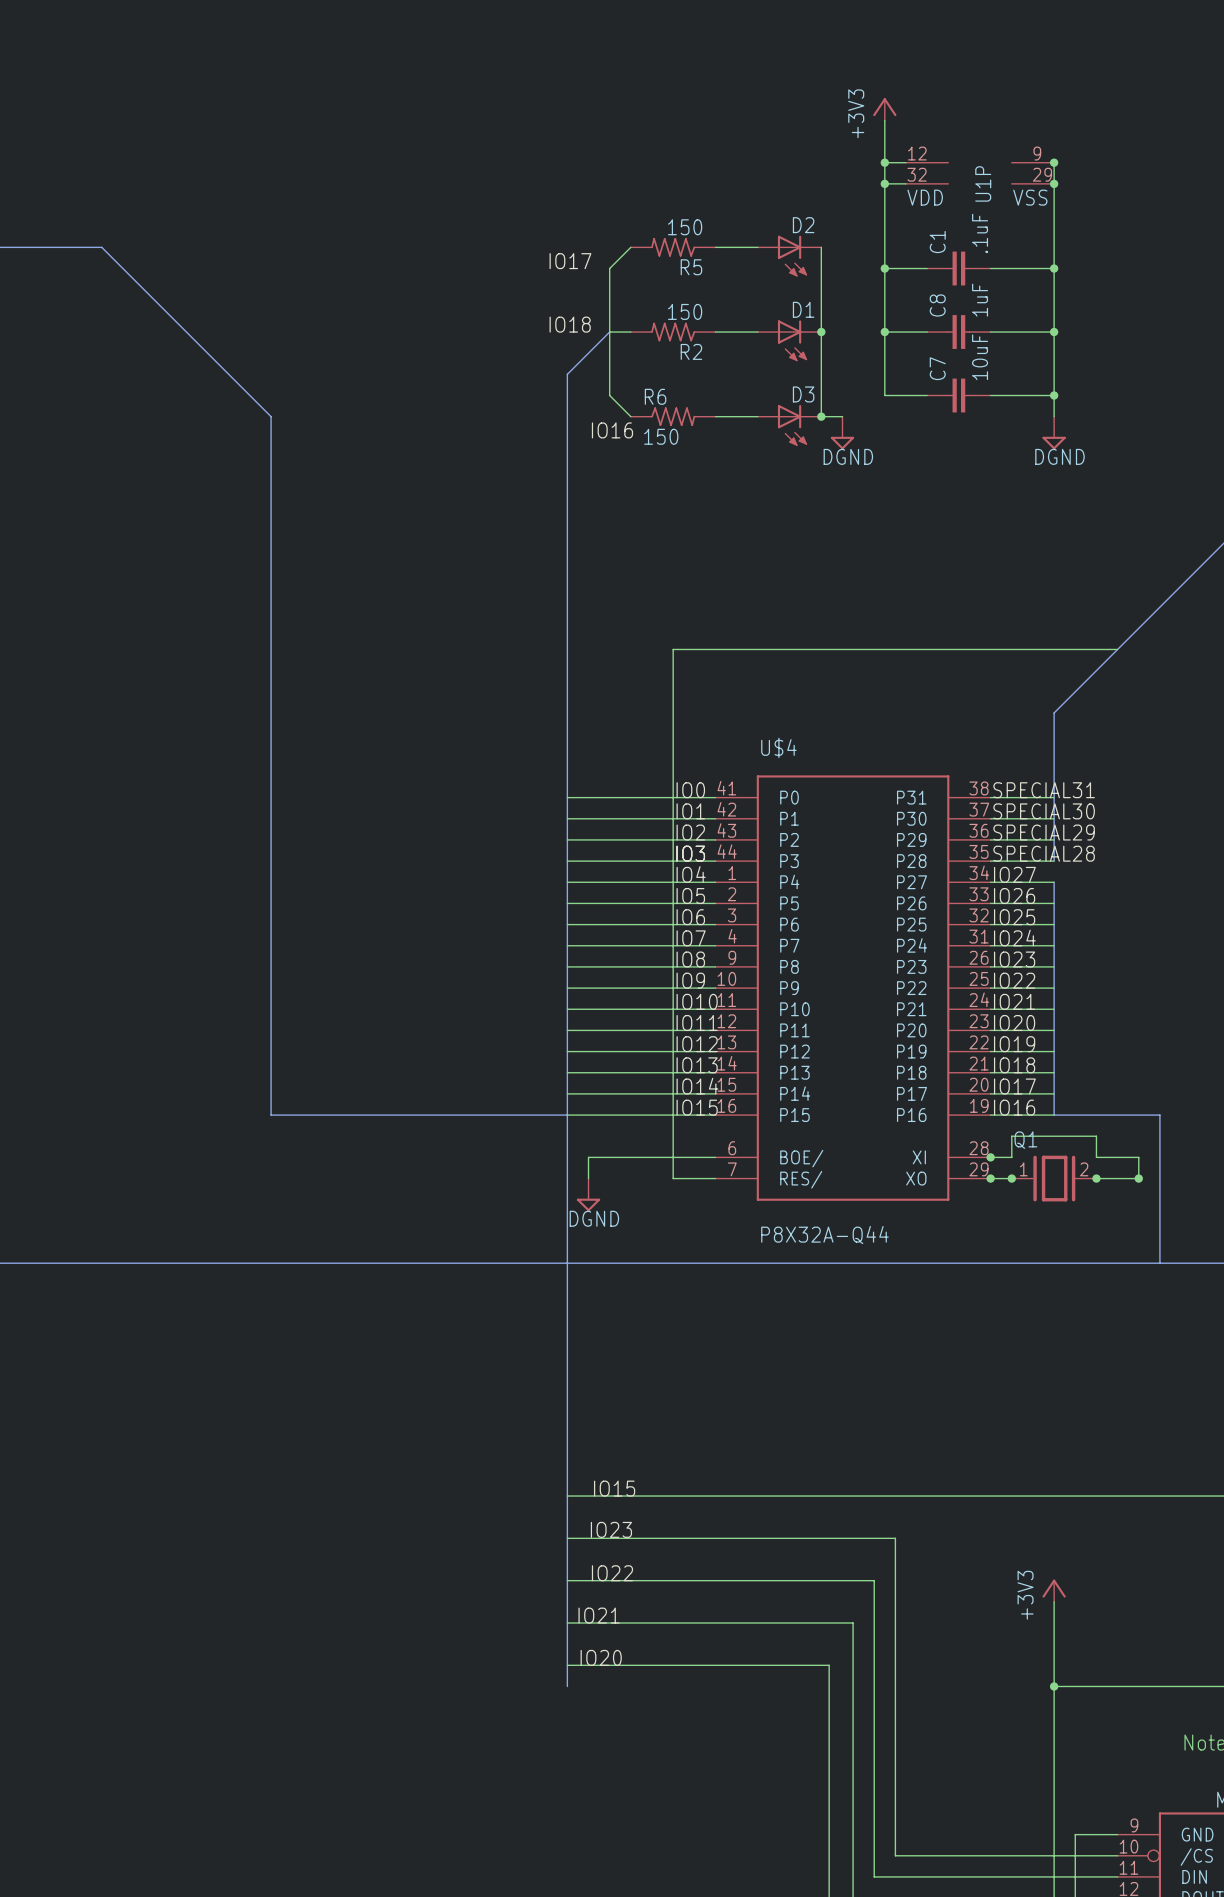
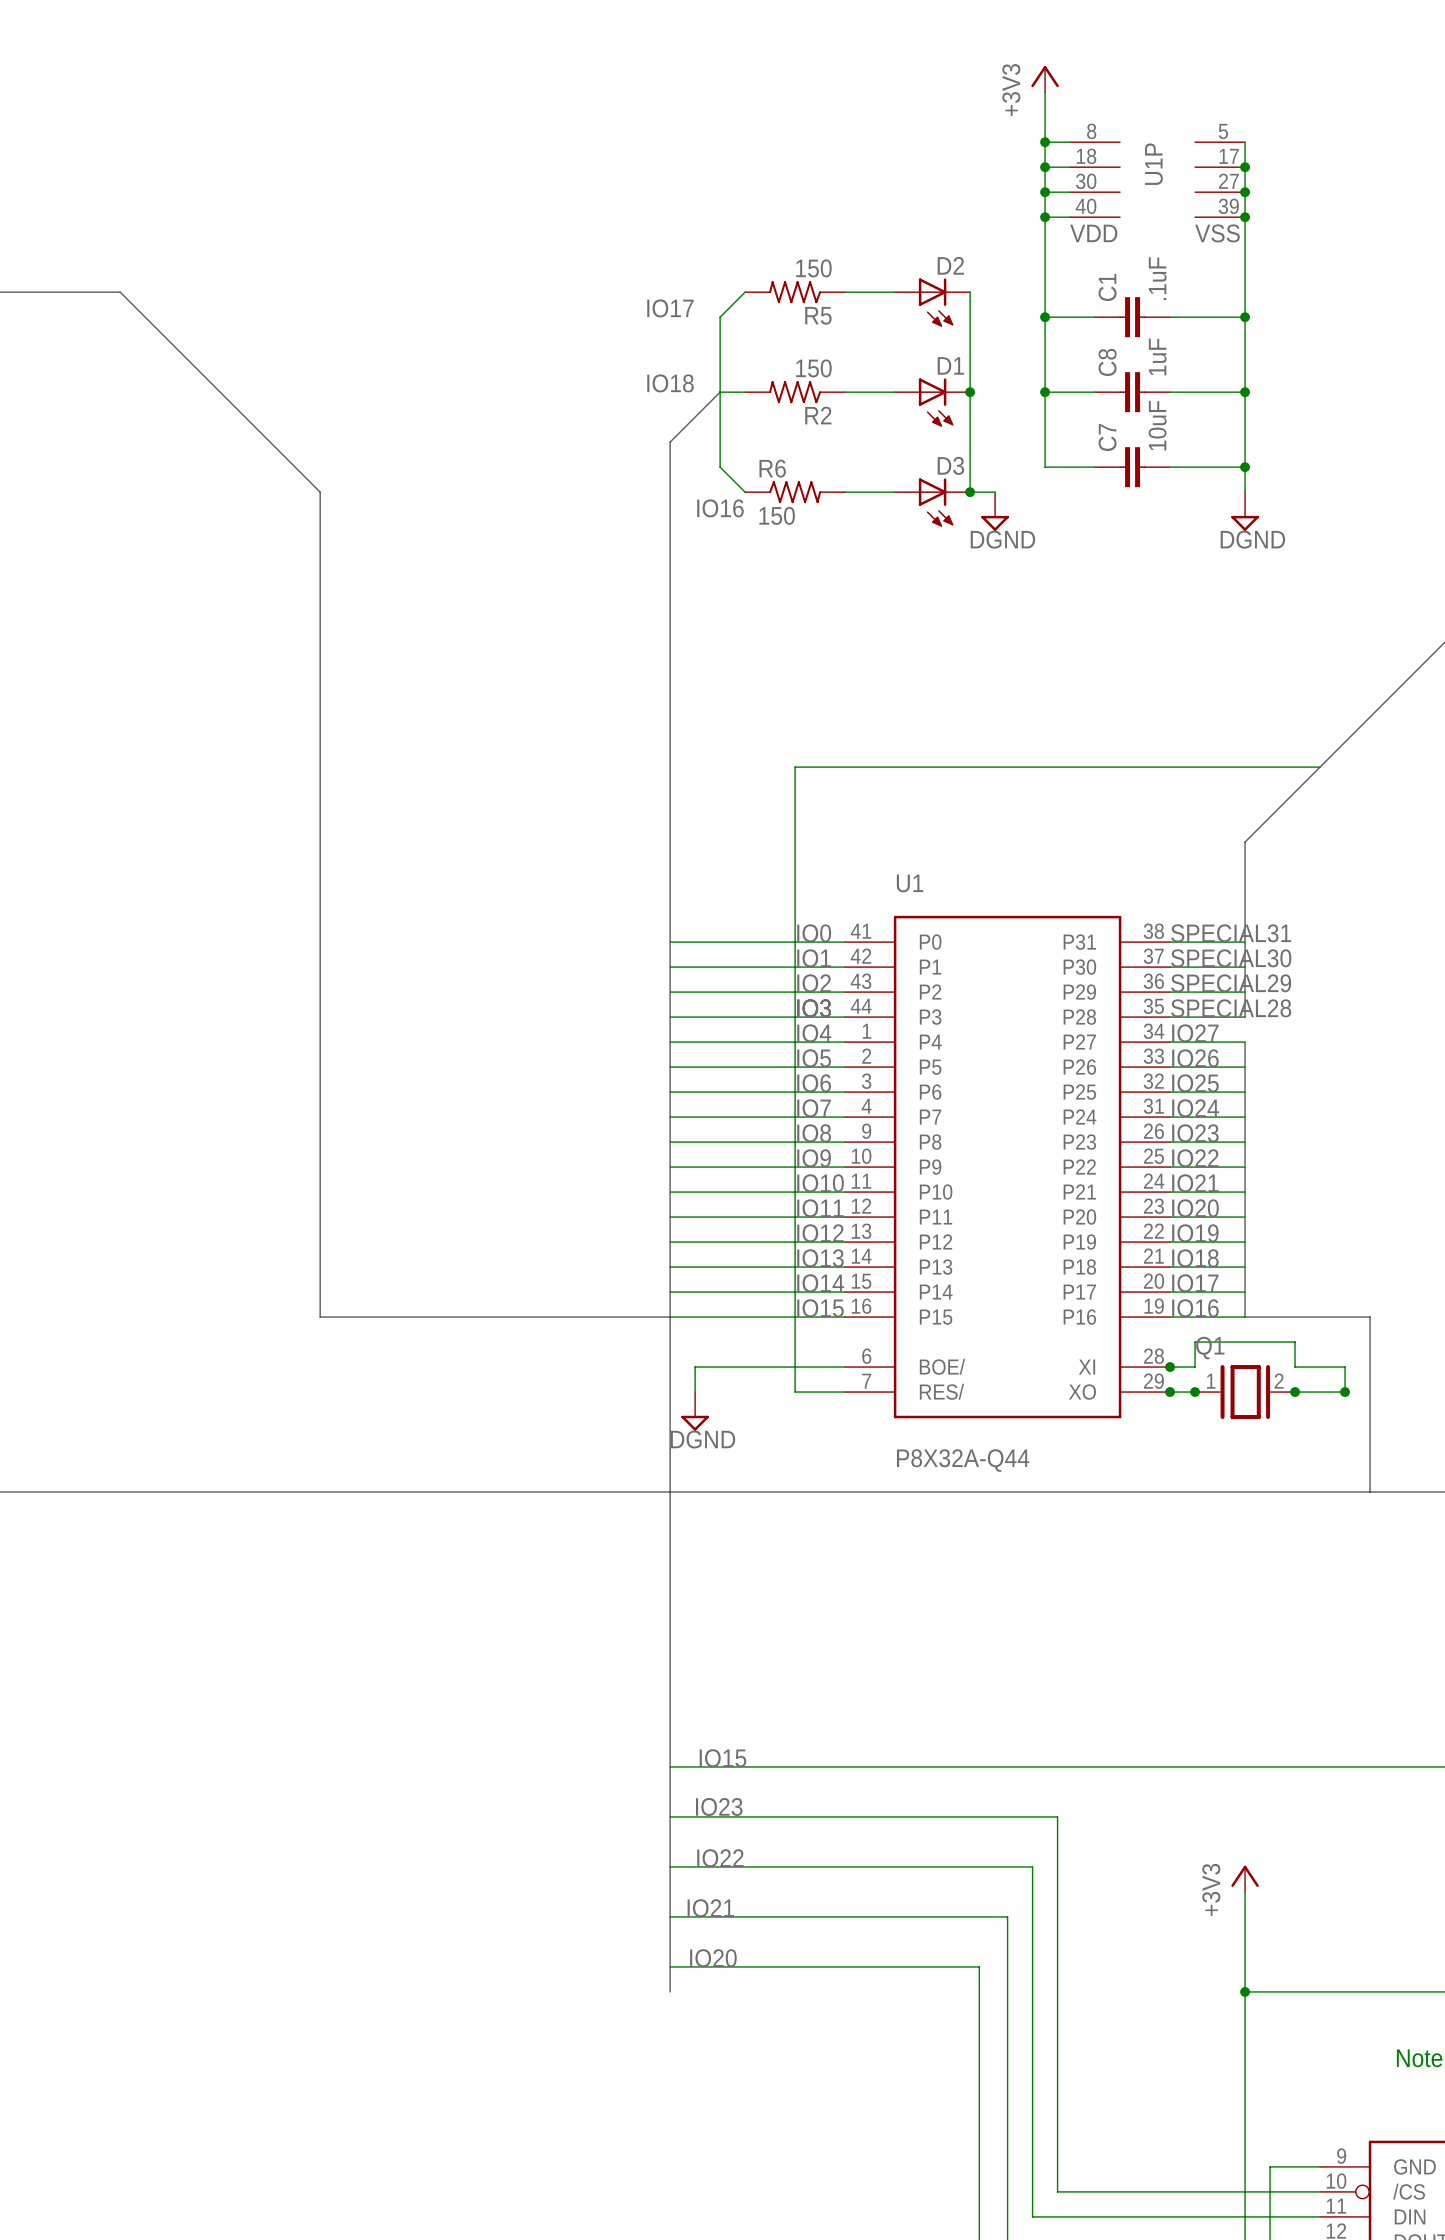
wire: none -> (1045, 92) (1045, 142) (1070, 142)
power symbol position: +3V3 (884, 109) -> +3V3 (1045, 79)
junction: none -> (1045, 142)
wire: none -> (1245, 142) (1245, 192)
wire: none -> (1045, 167) (1070, 167)
junction: none -> (1045, 167)
junction: none -> (1245, 167)
U1P symbol: [905, 162, 1055, 184] -> [1070, 142, 1246, 218]
U1P name position: U1P (983, 183) -> U1P (1153, 164)
U$4 name: U$4 (778, 747) -> U1 (910, 883)

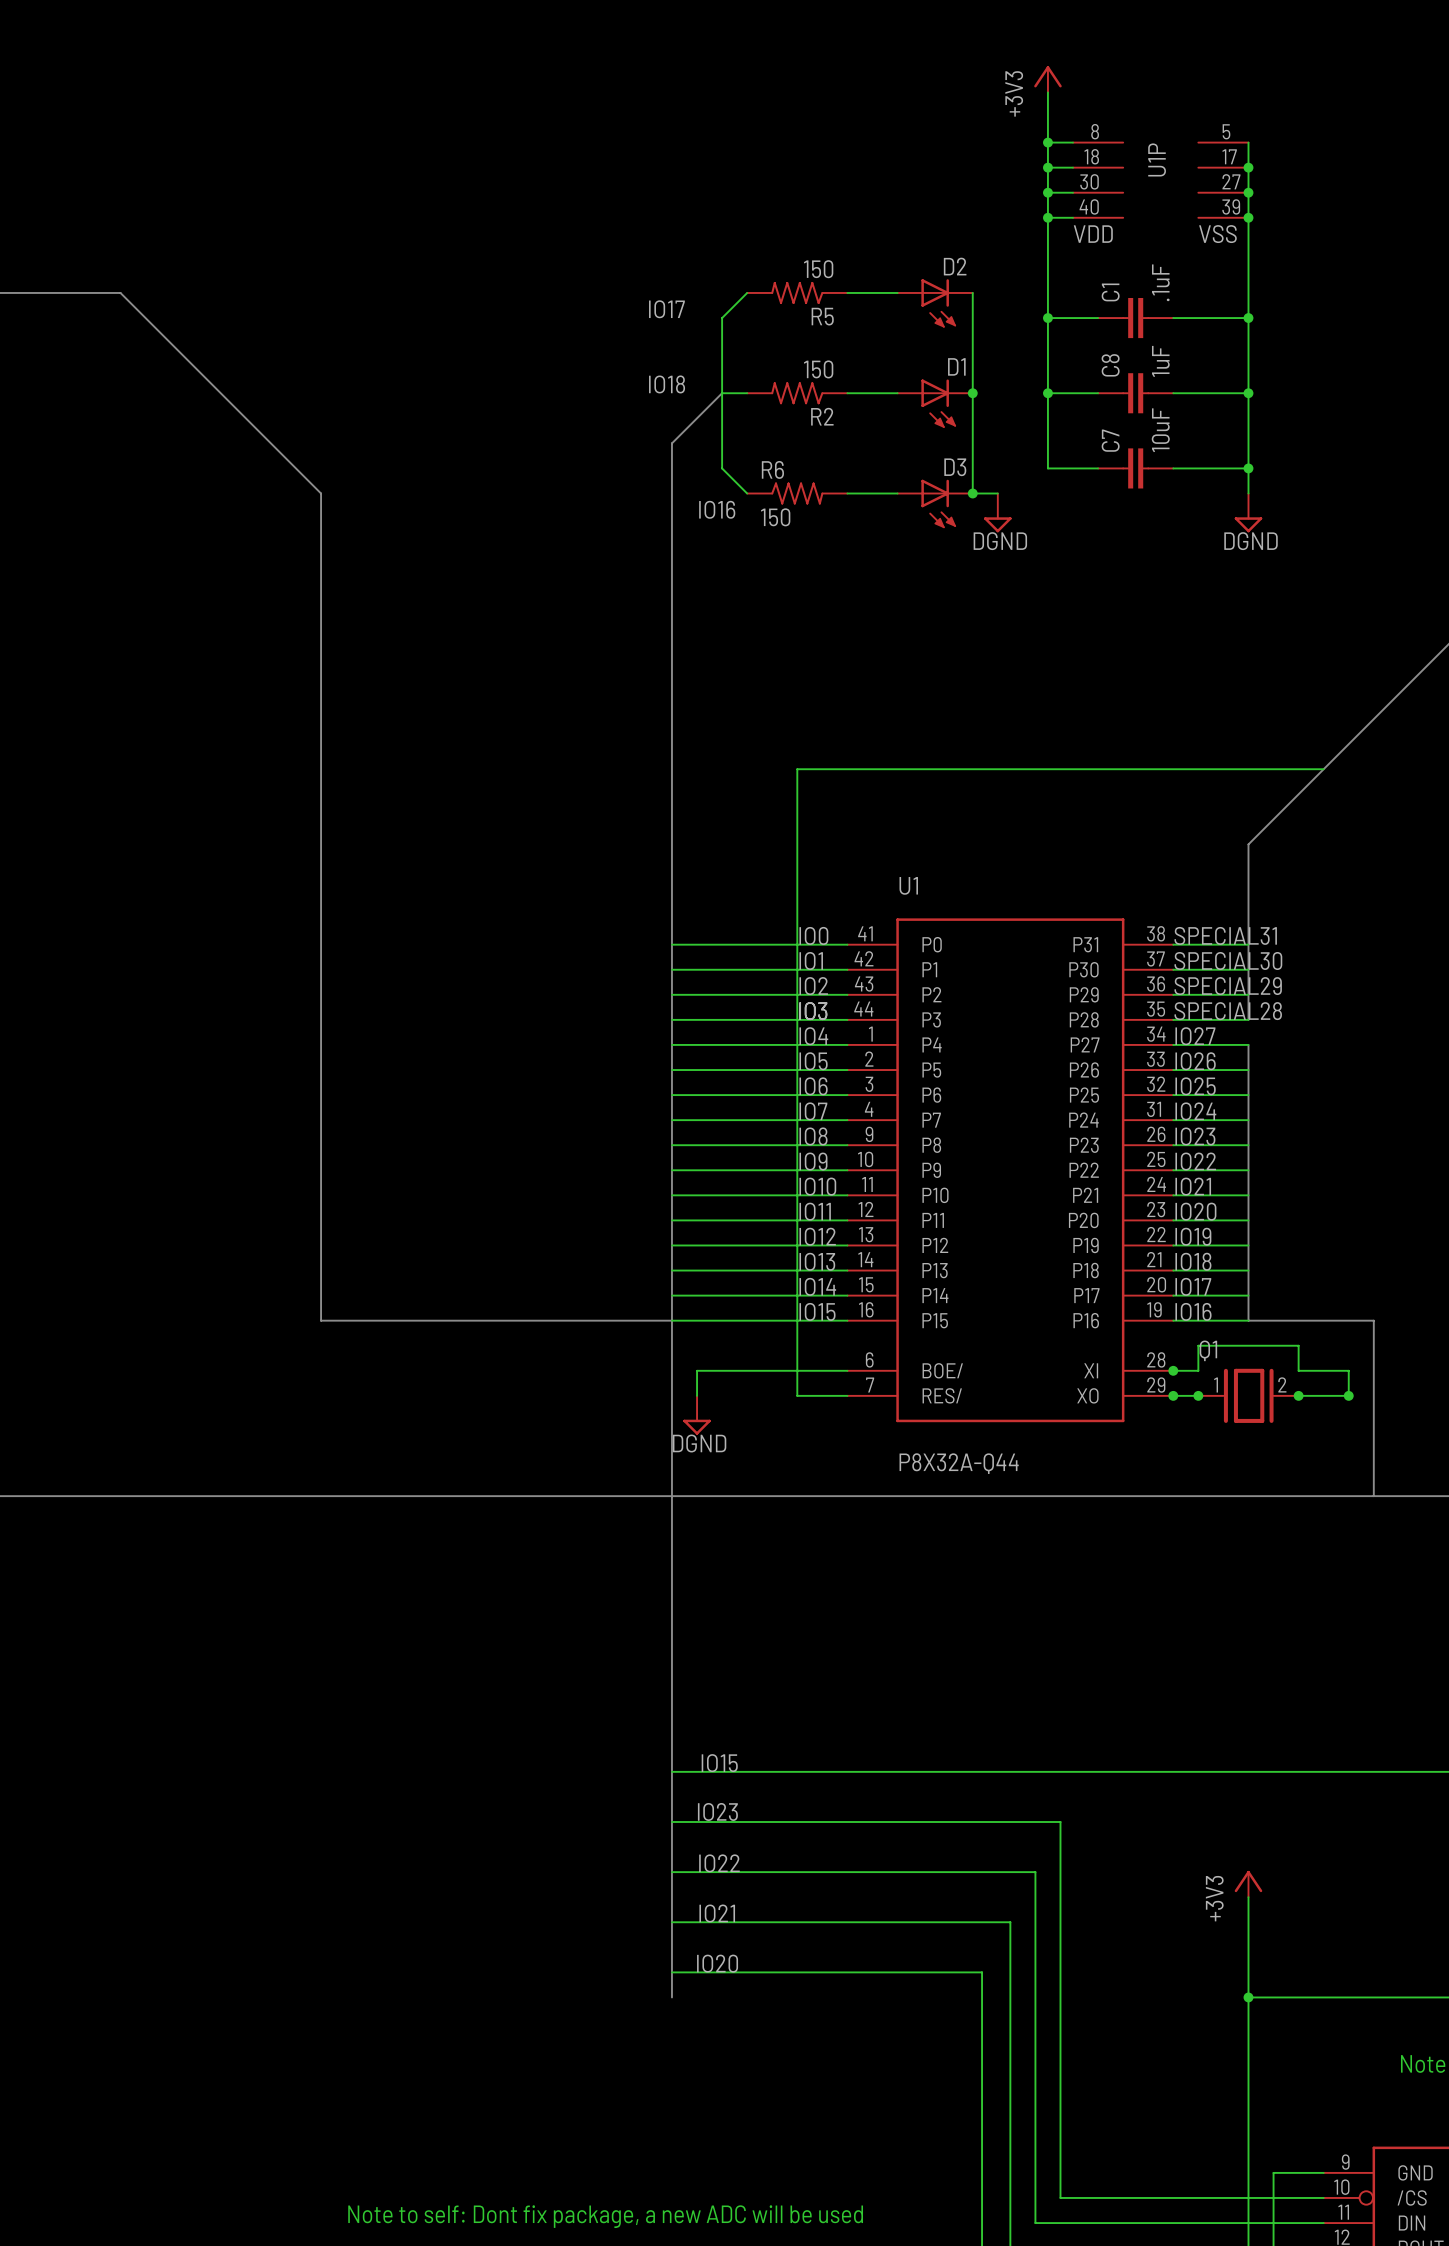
text: none -> Note to self: Dont fix package, a new ADC will be used (605, 2216)

